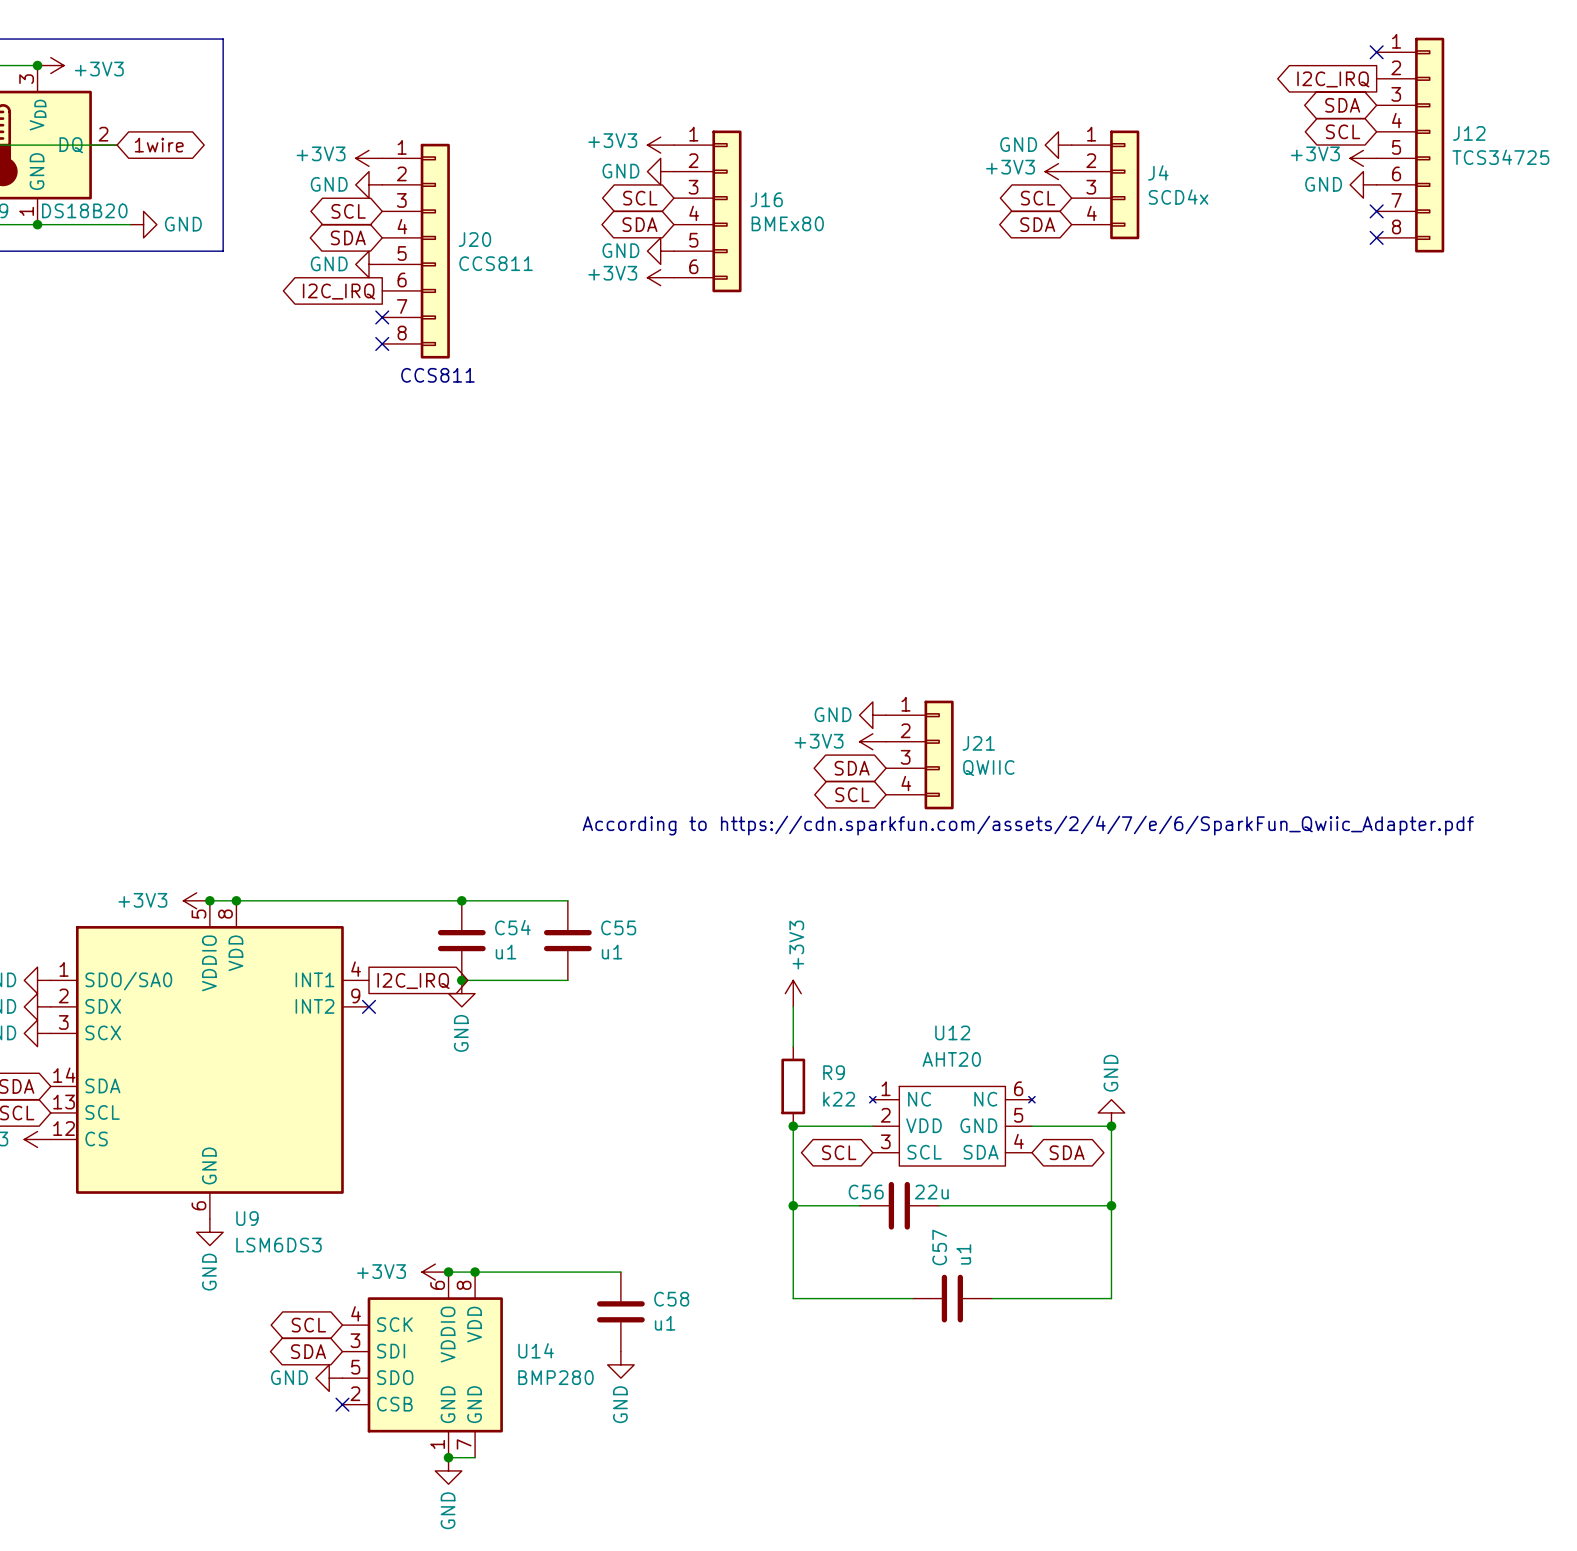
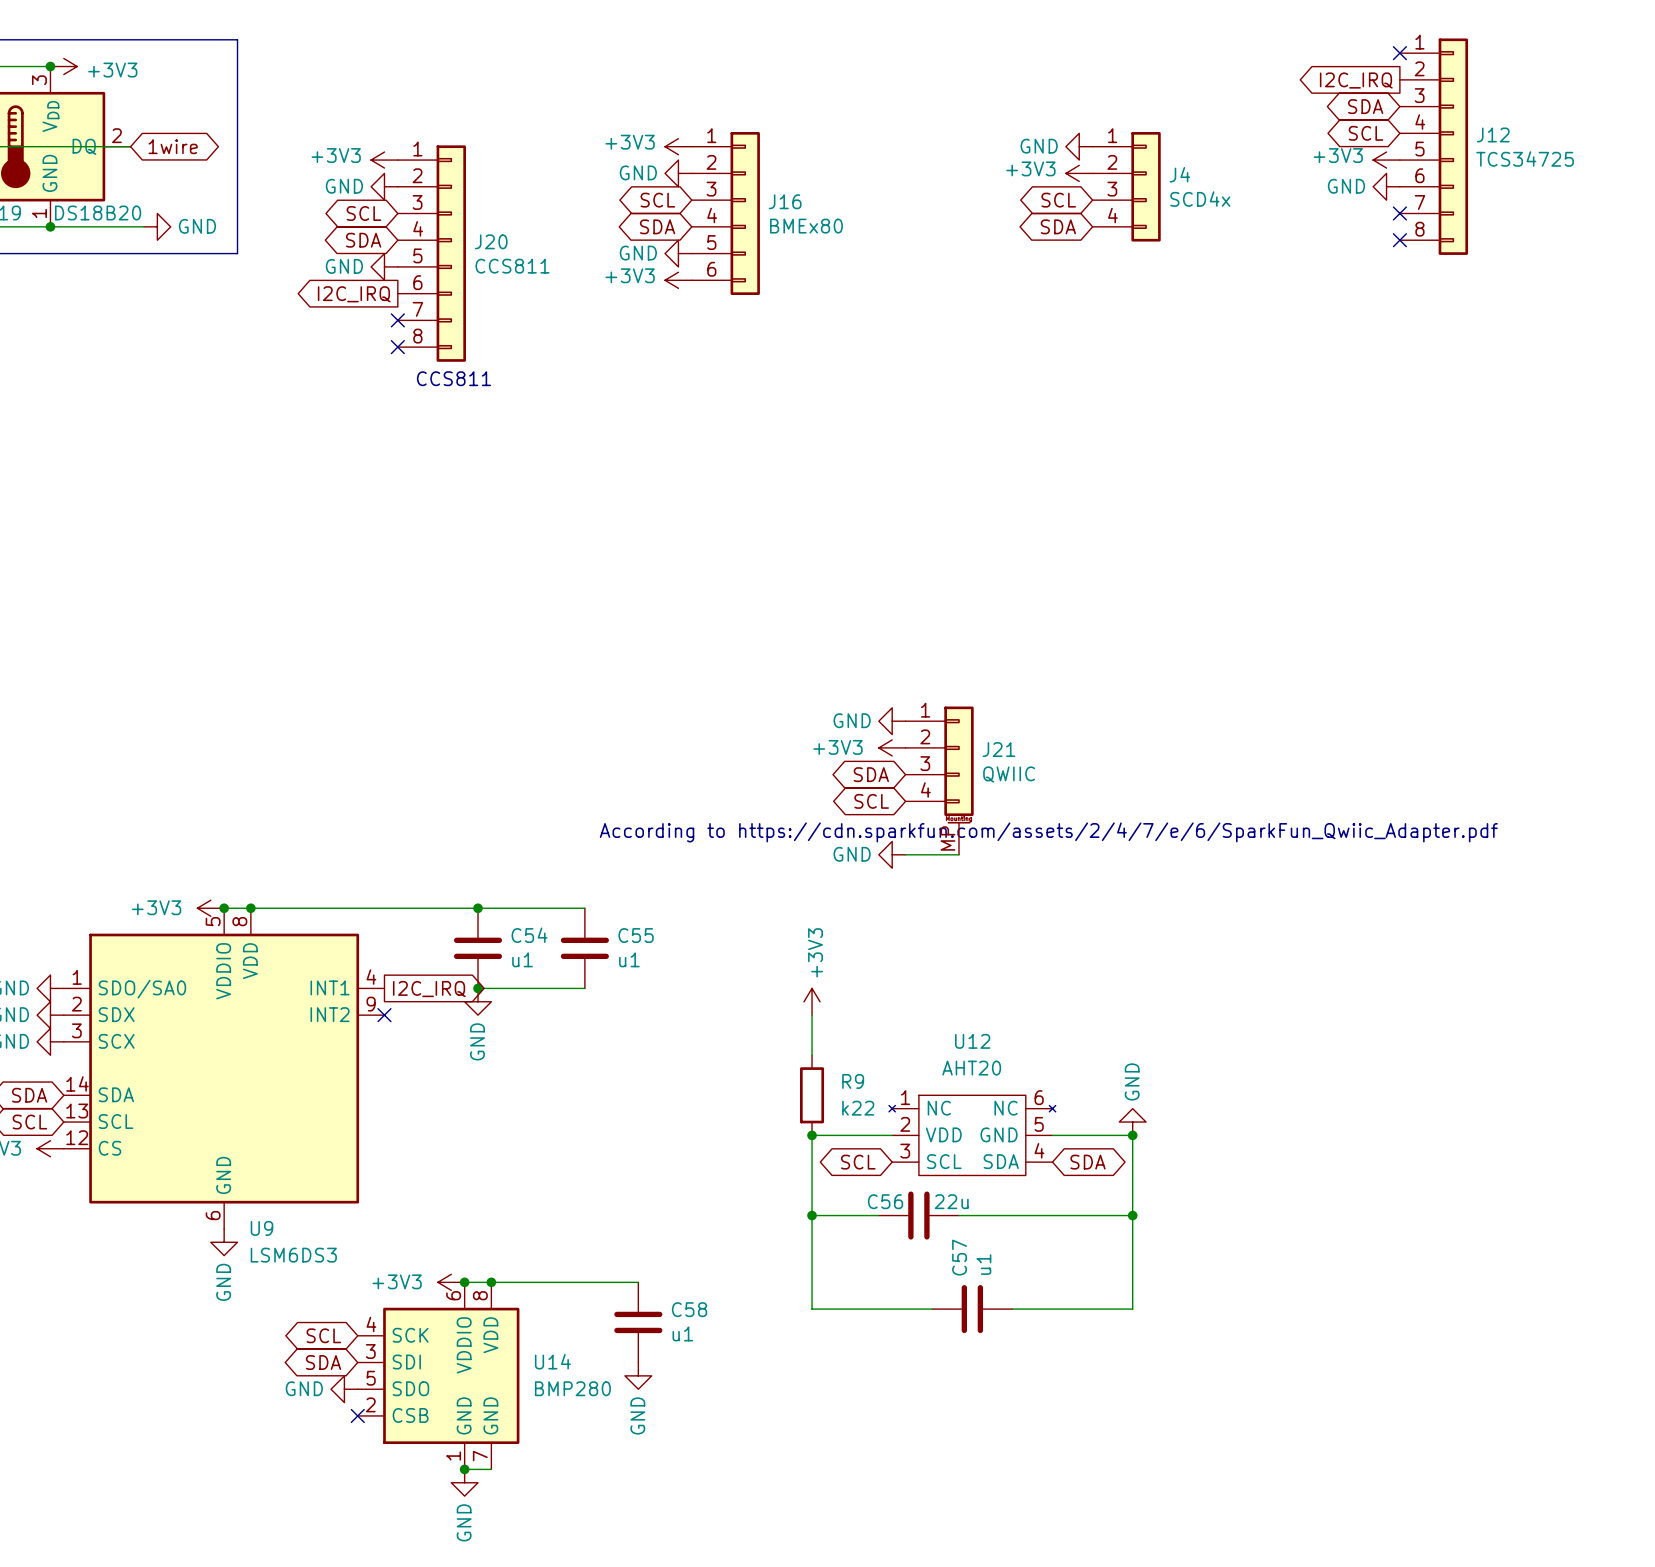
J21 symbol: [886, 700, 954, 810] -> [905, 706, 974, 855]
power symbol: none -> GND (892, 854)
wire: none -> (905, 854) (958, 854)

